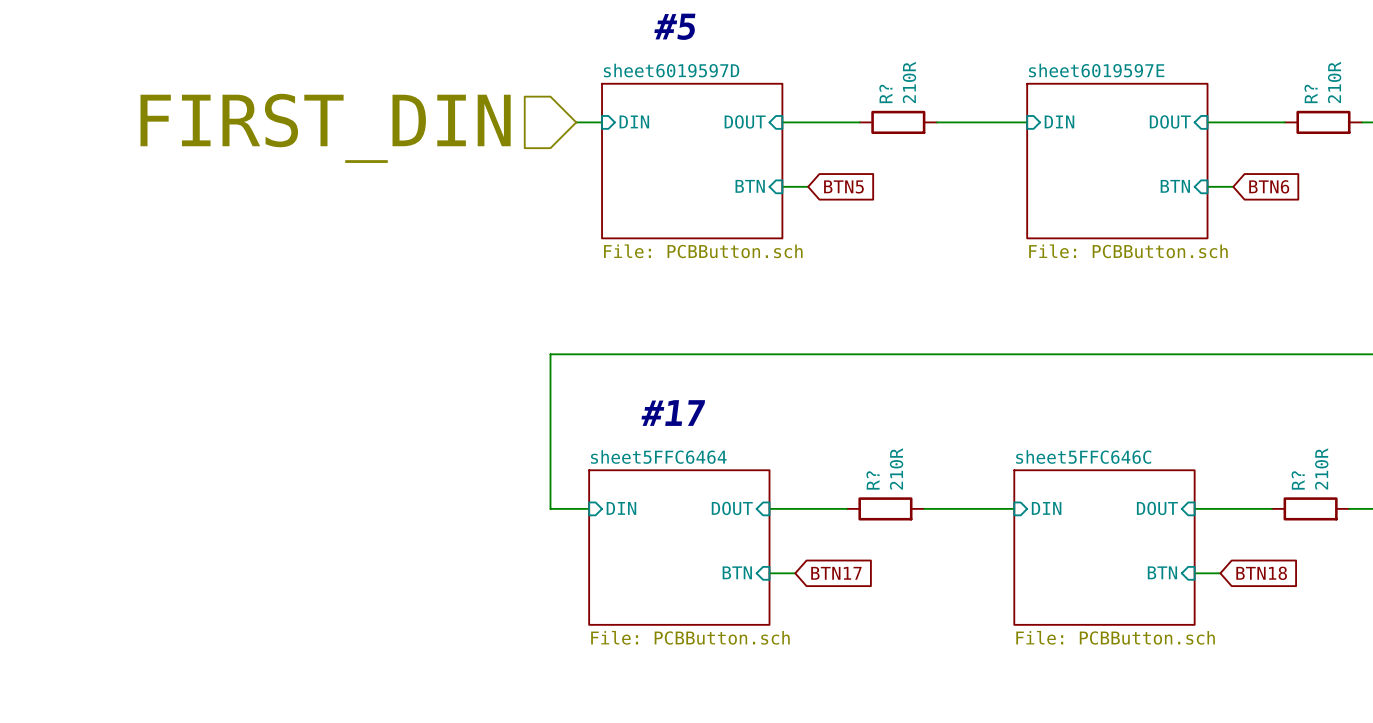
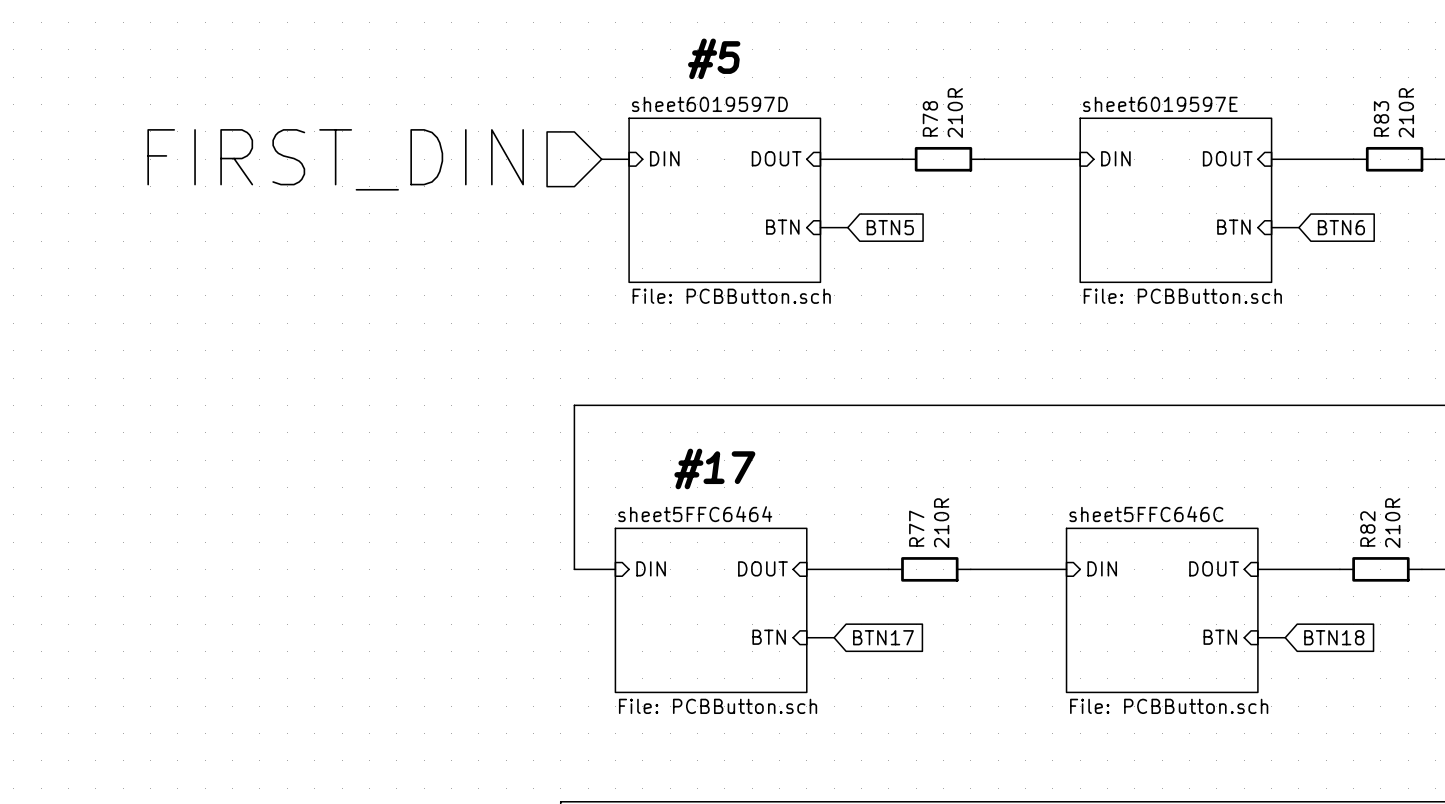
R? name: R? (885, 93) -> R78 (930, 118)
R? name: R? (1311, 93) -> R83 (1381, 118)
R? name: R? (873, 480) -> R77 (916, 528)
R? name: R? (1298, 480) -> R82 (1367, 528)

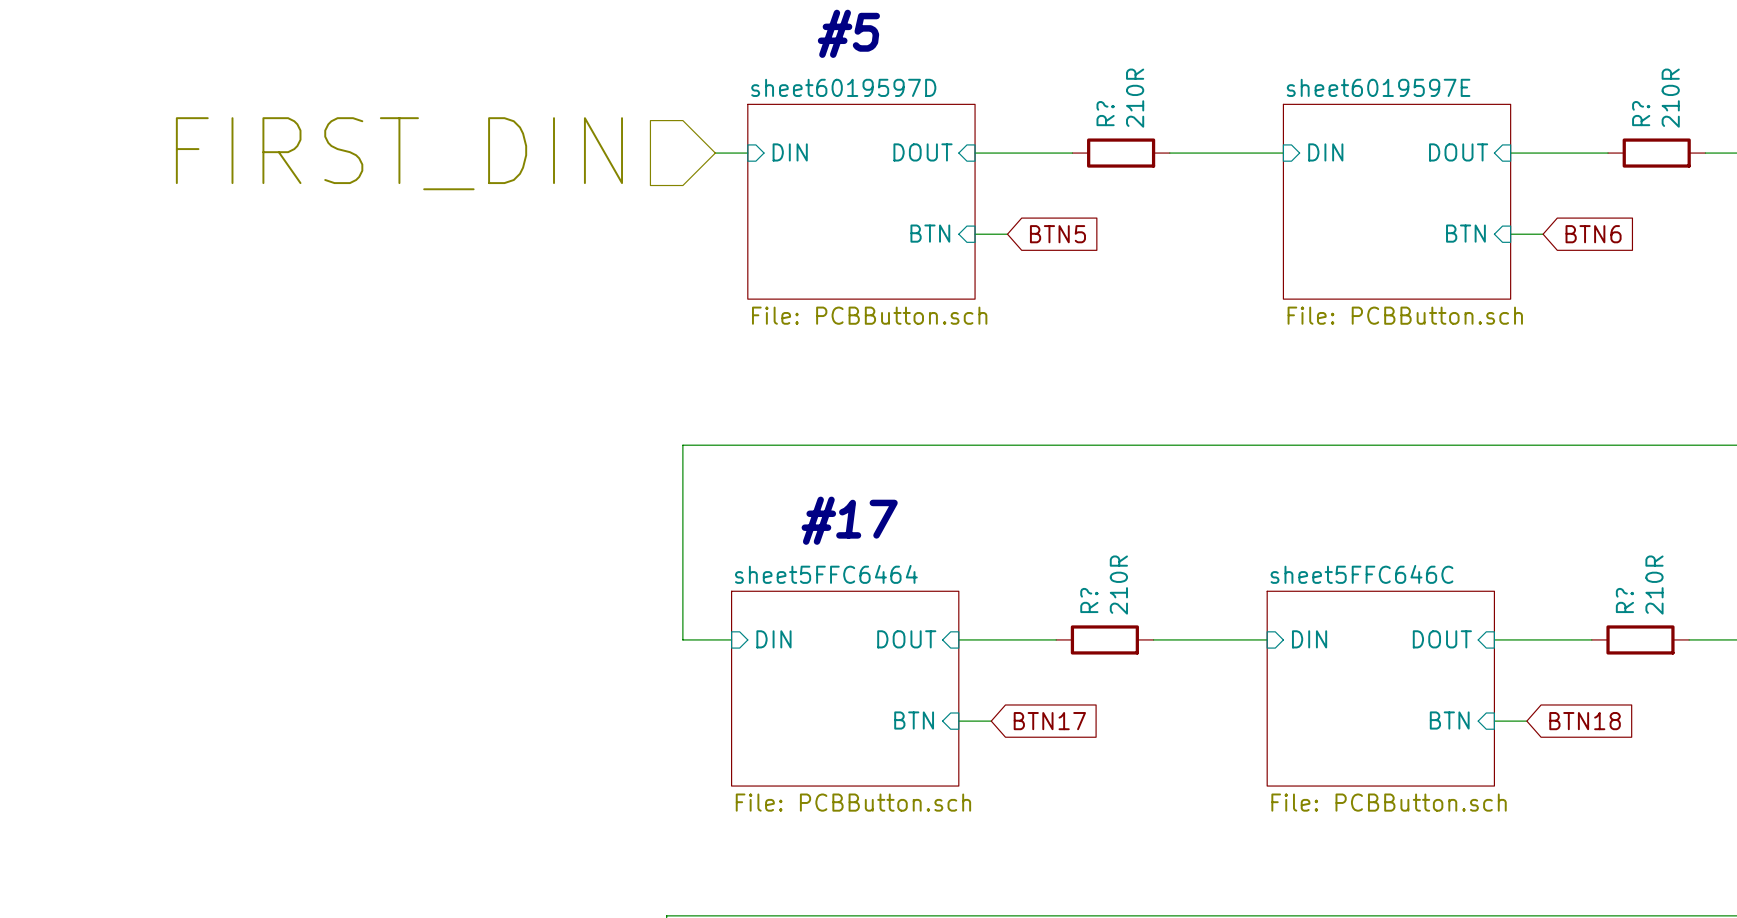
R78 name: R78 (930, 118) -> R? (1105, 113)
R83 name: R83 (1381, 118) -> R? (1641, 113)
R77 name: R77 (916, 528) -> R? (1089, 600)
R82 name: R82 (1367, 528) -> R? (1624, 600)

